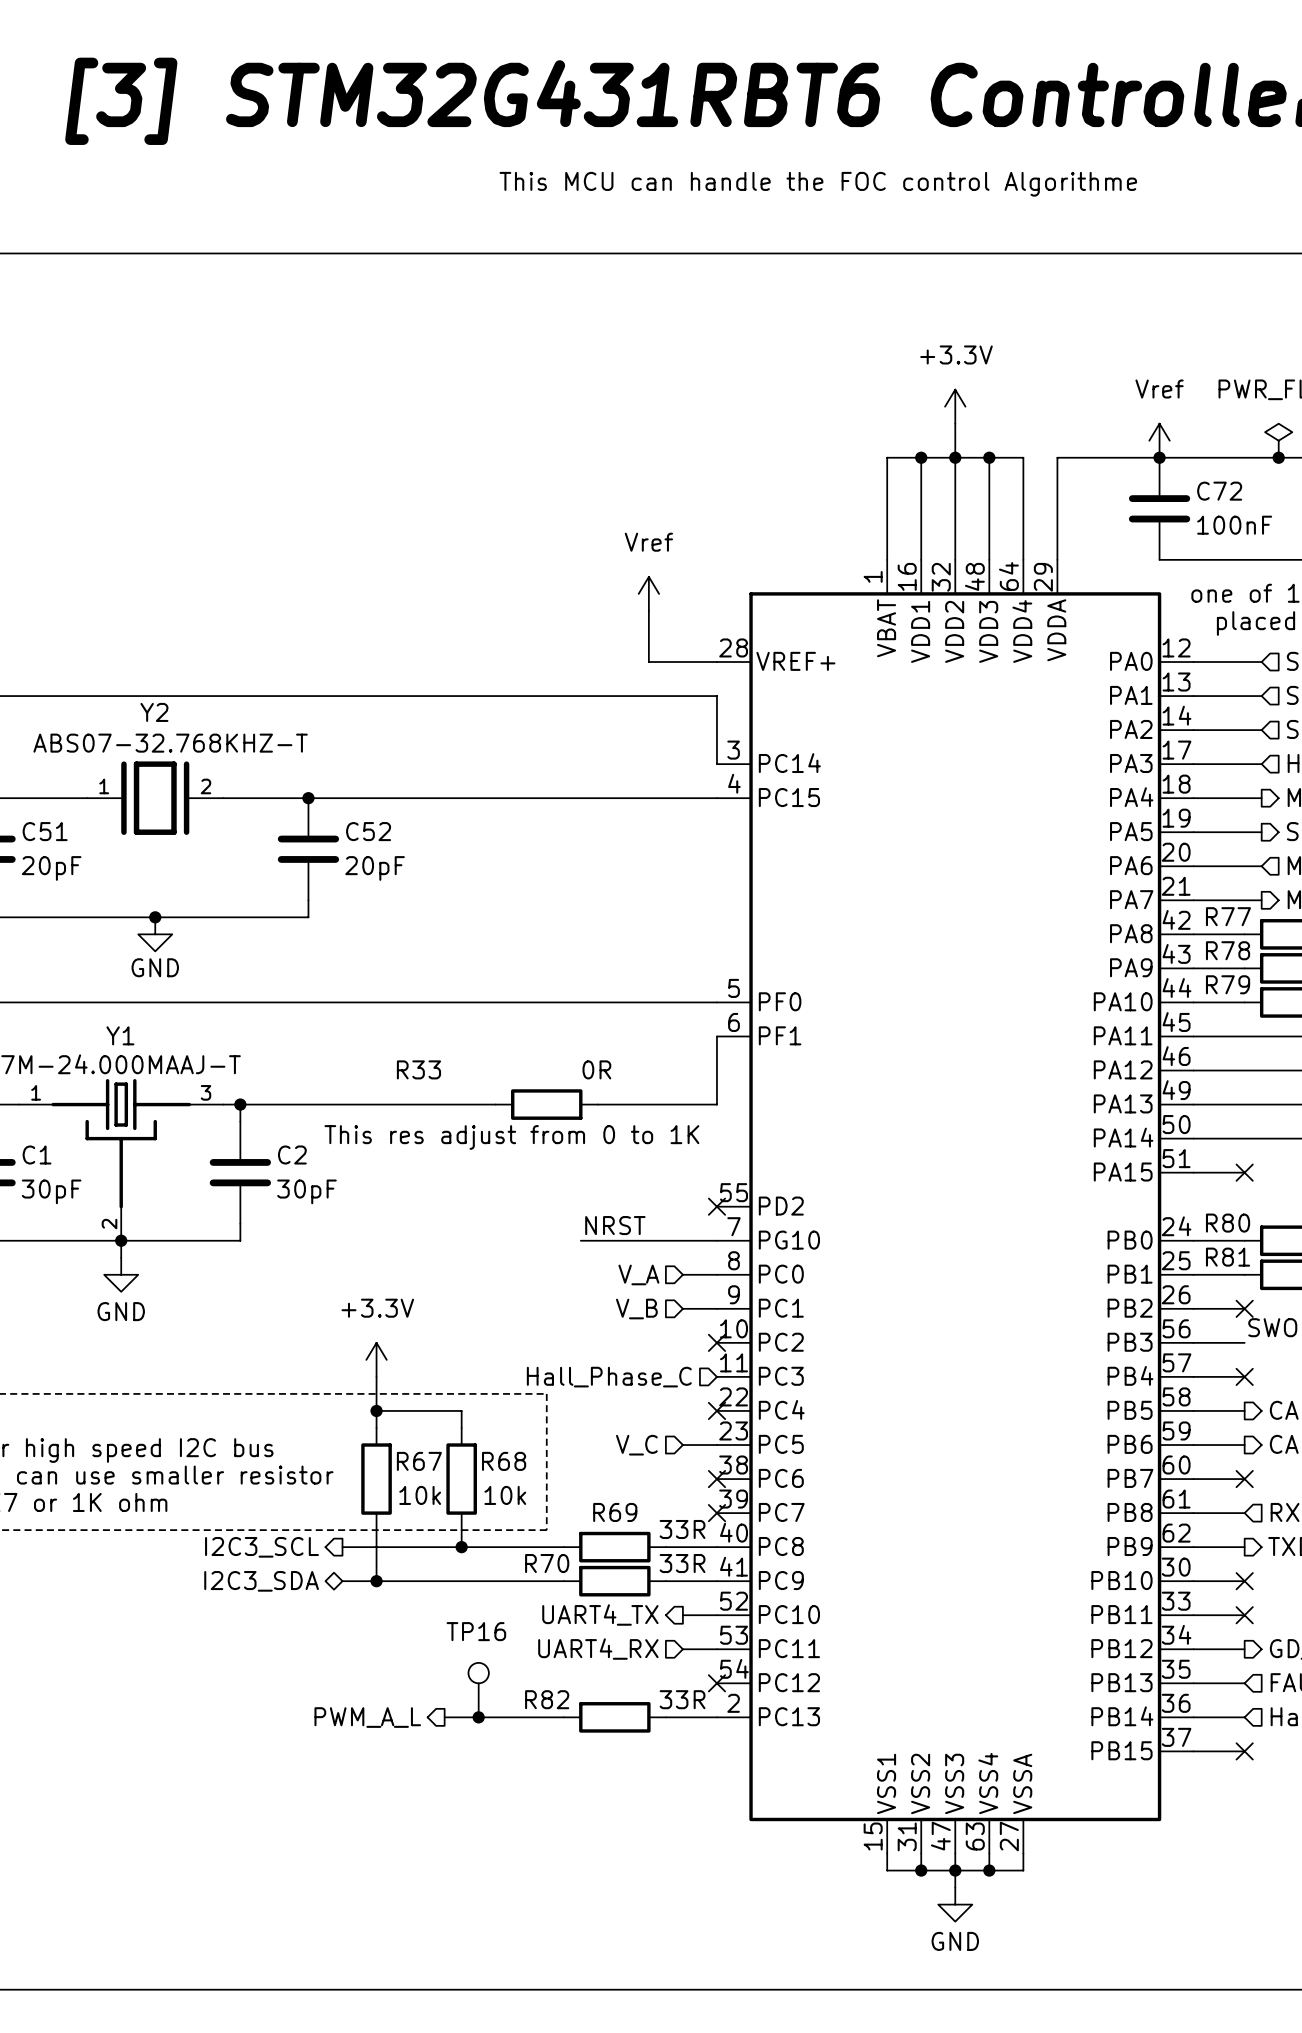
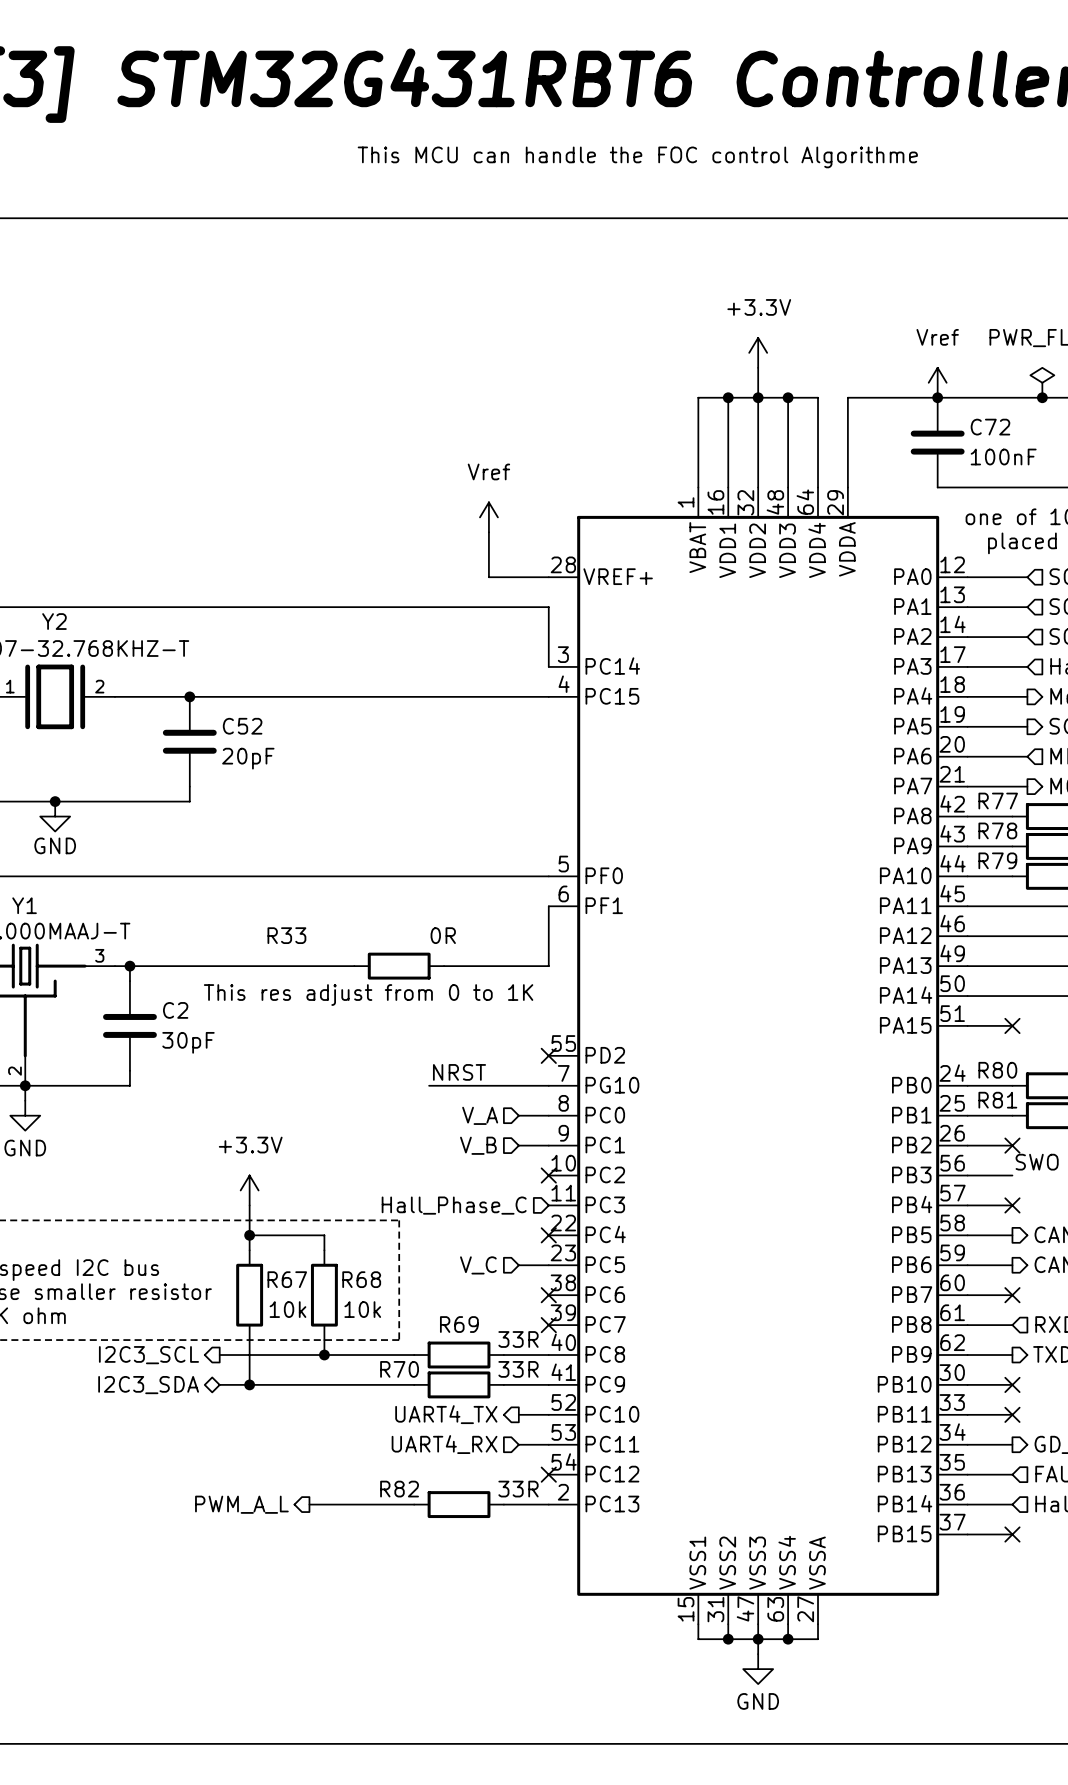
TP16: (478, 1690) -> none
junction: (478, 1717) -> none

